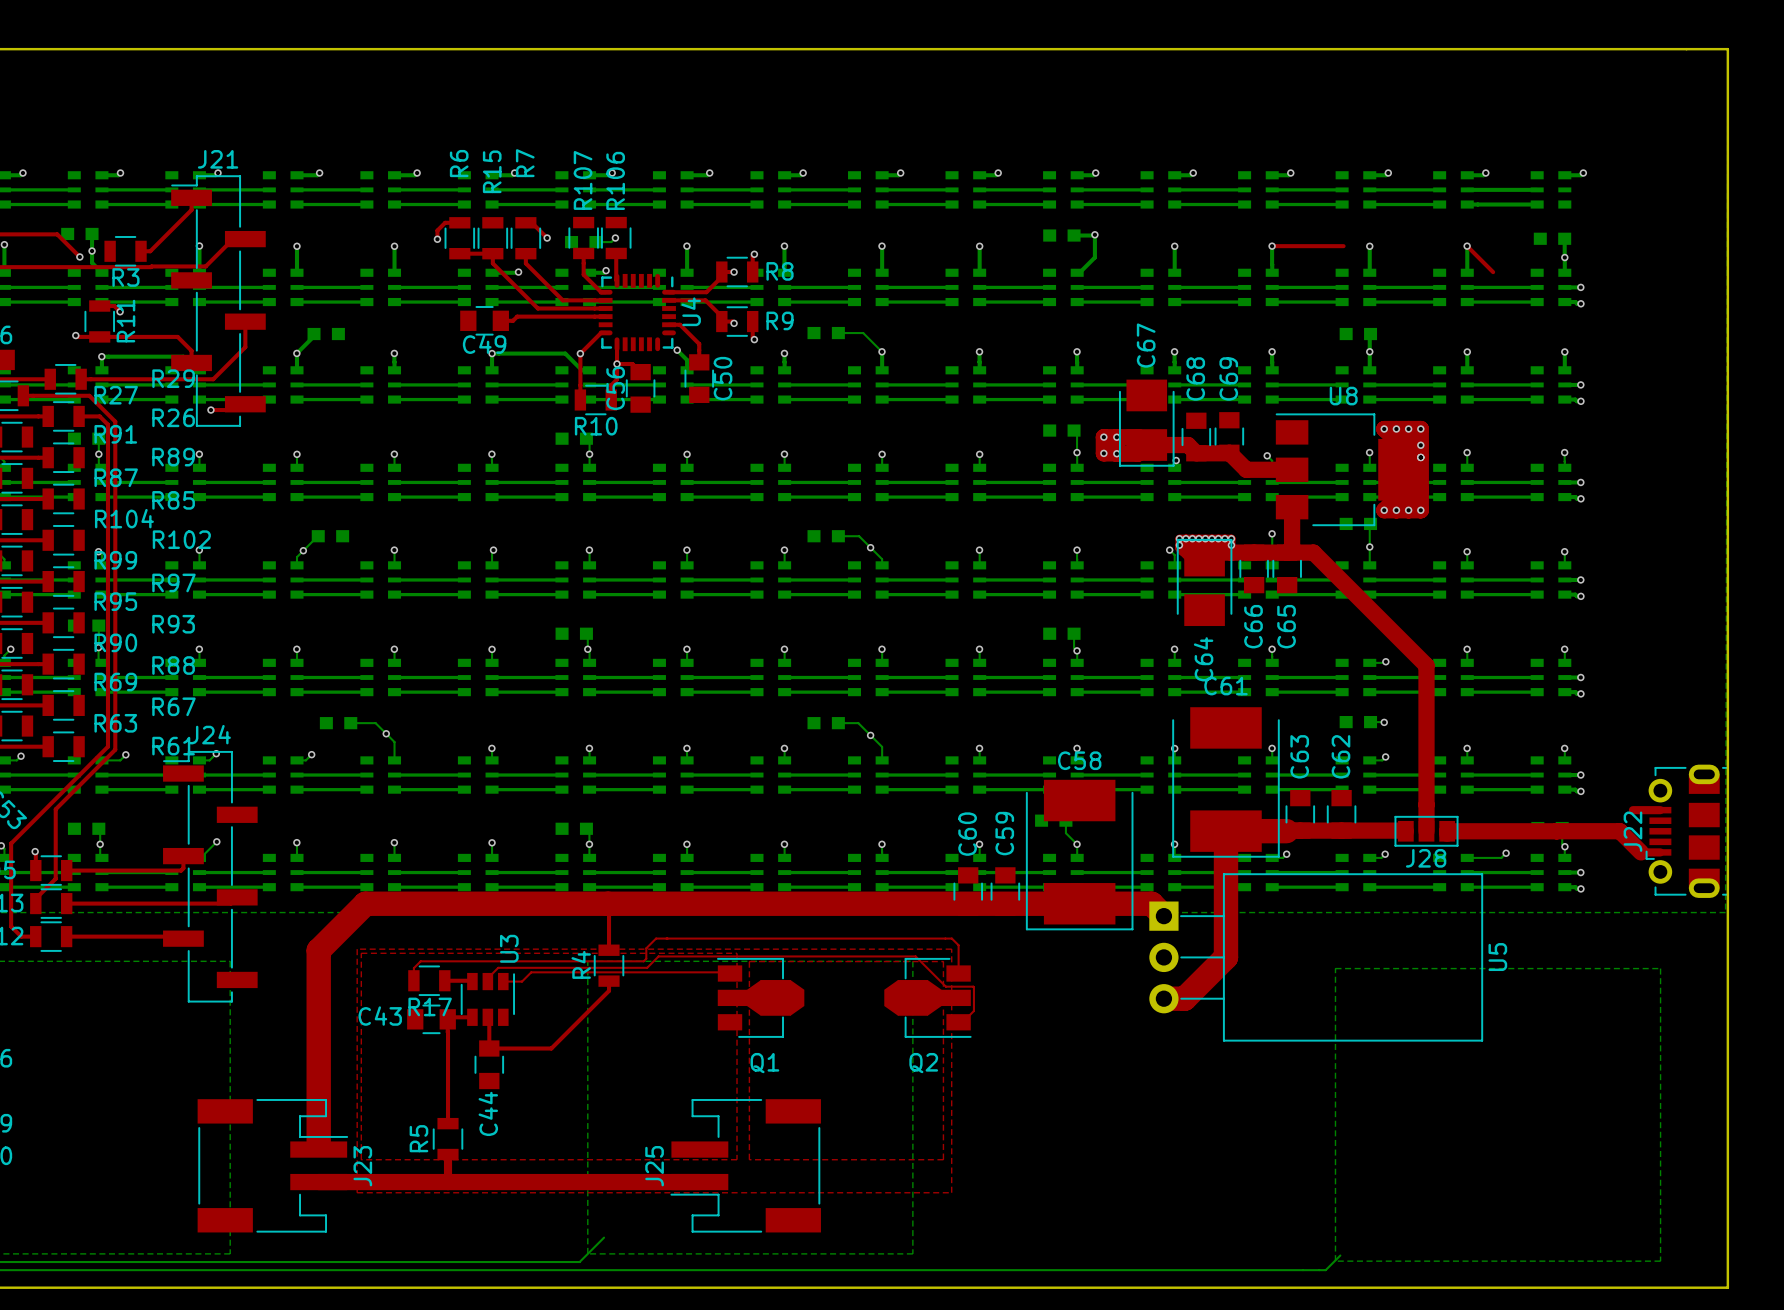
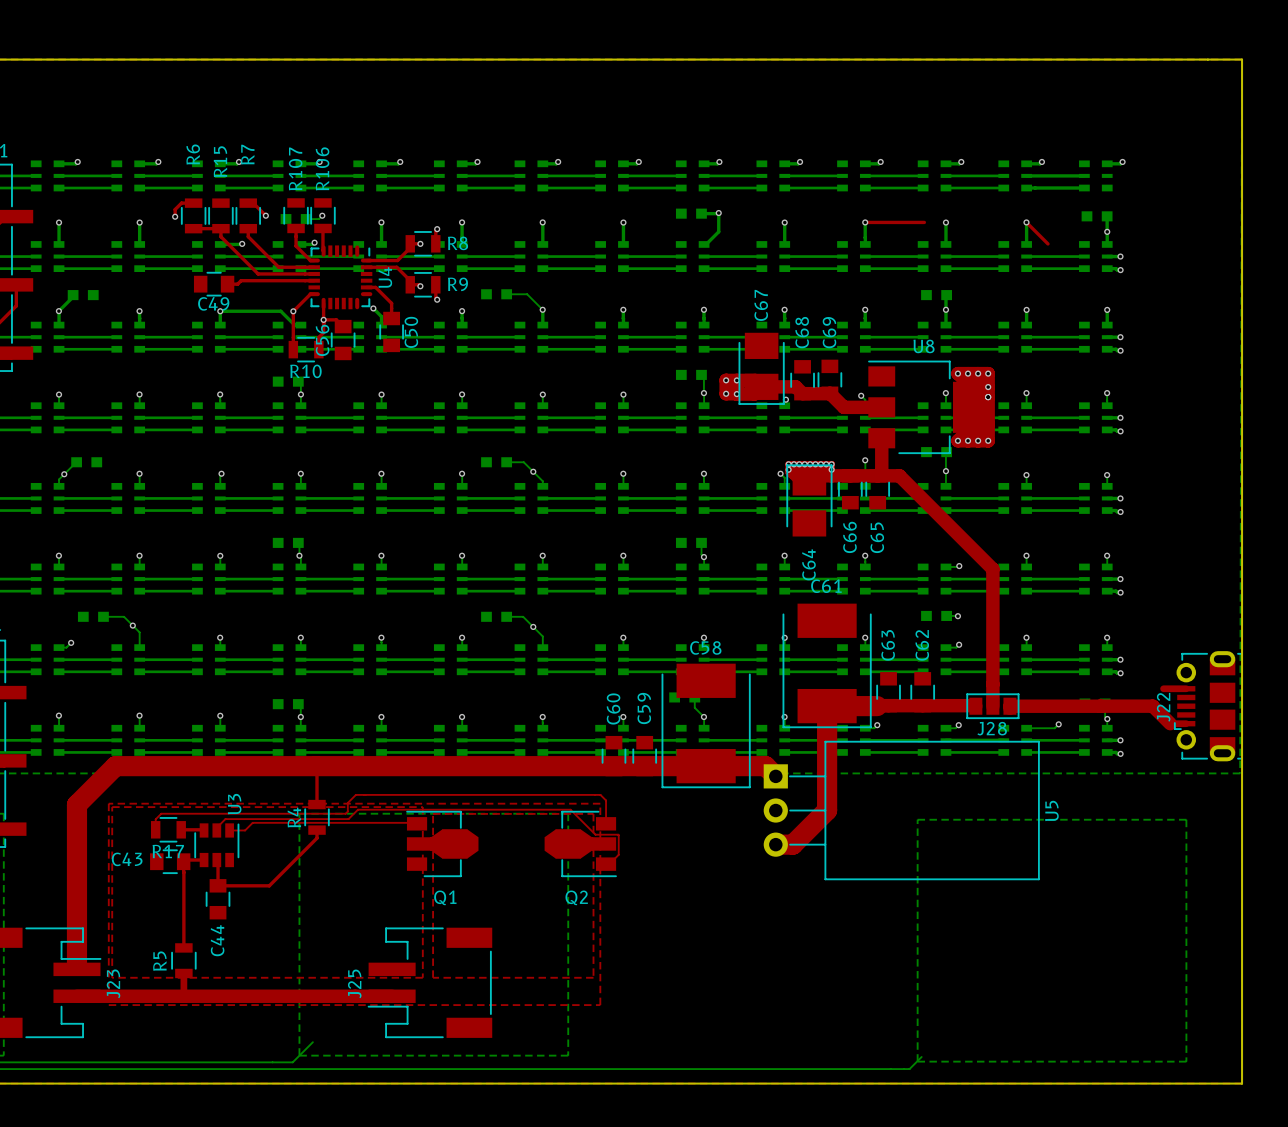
bottom track: none -> (945, 740) (1003, 740)

